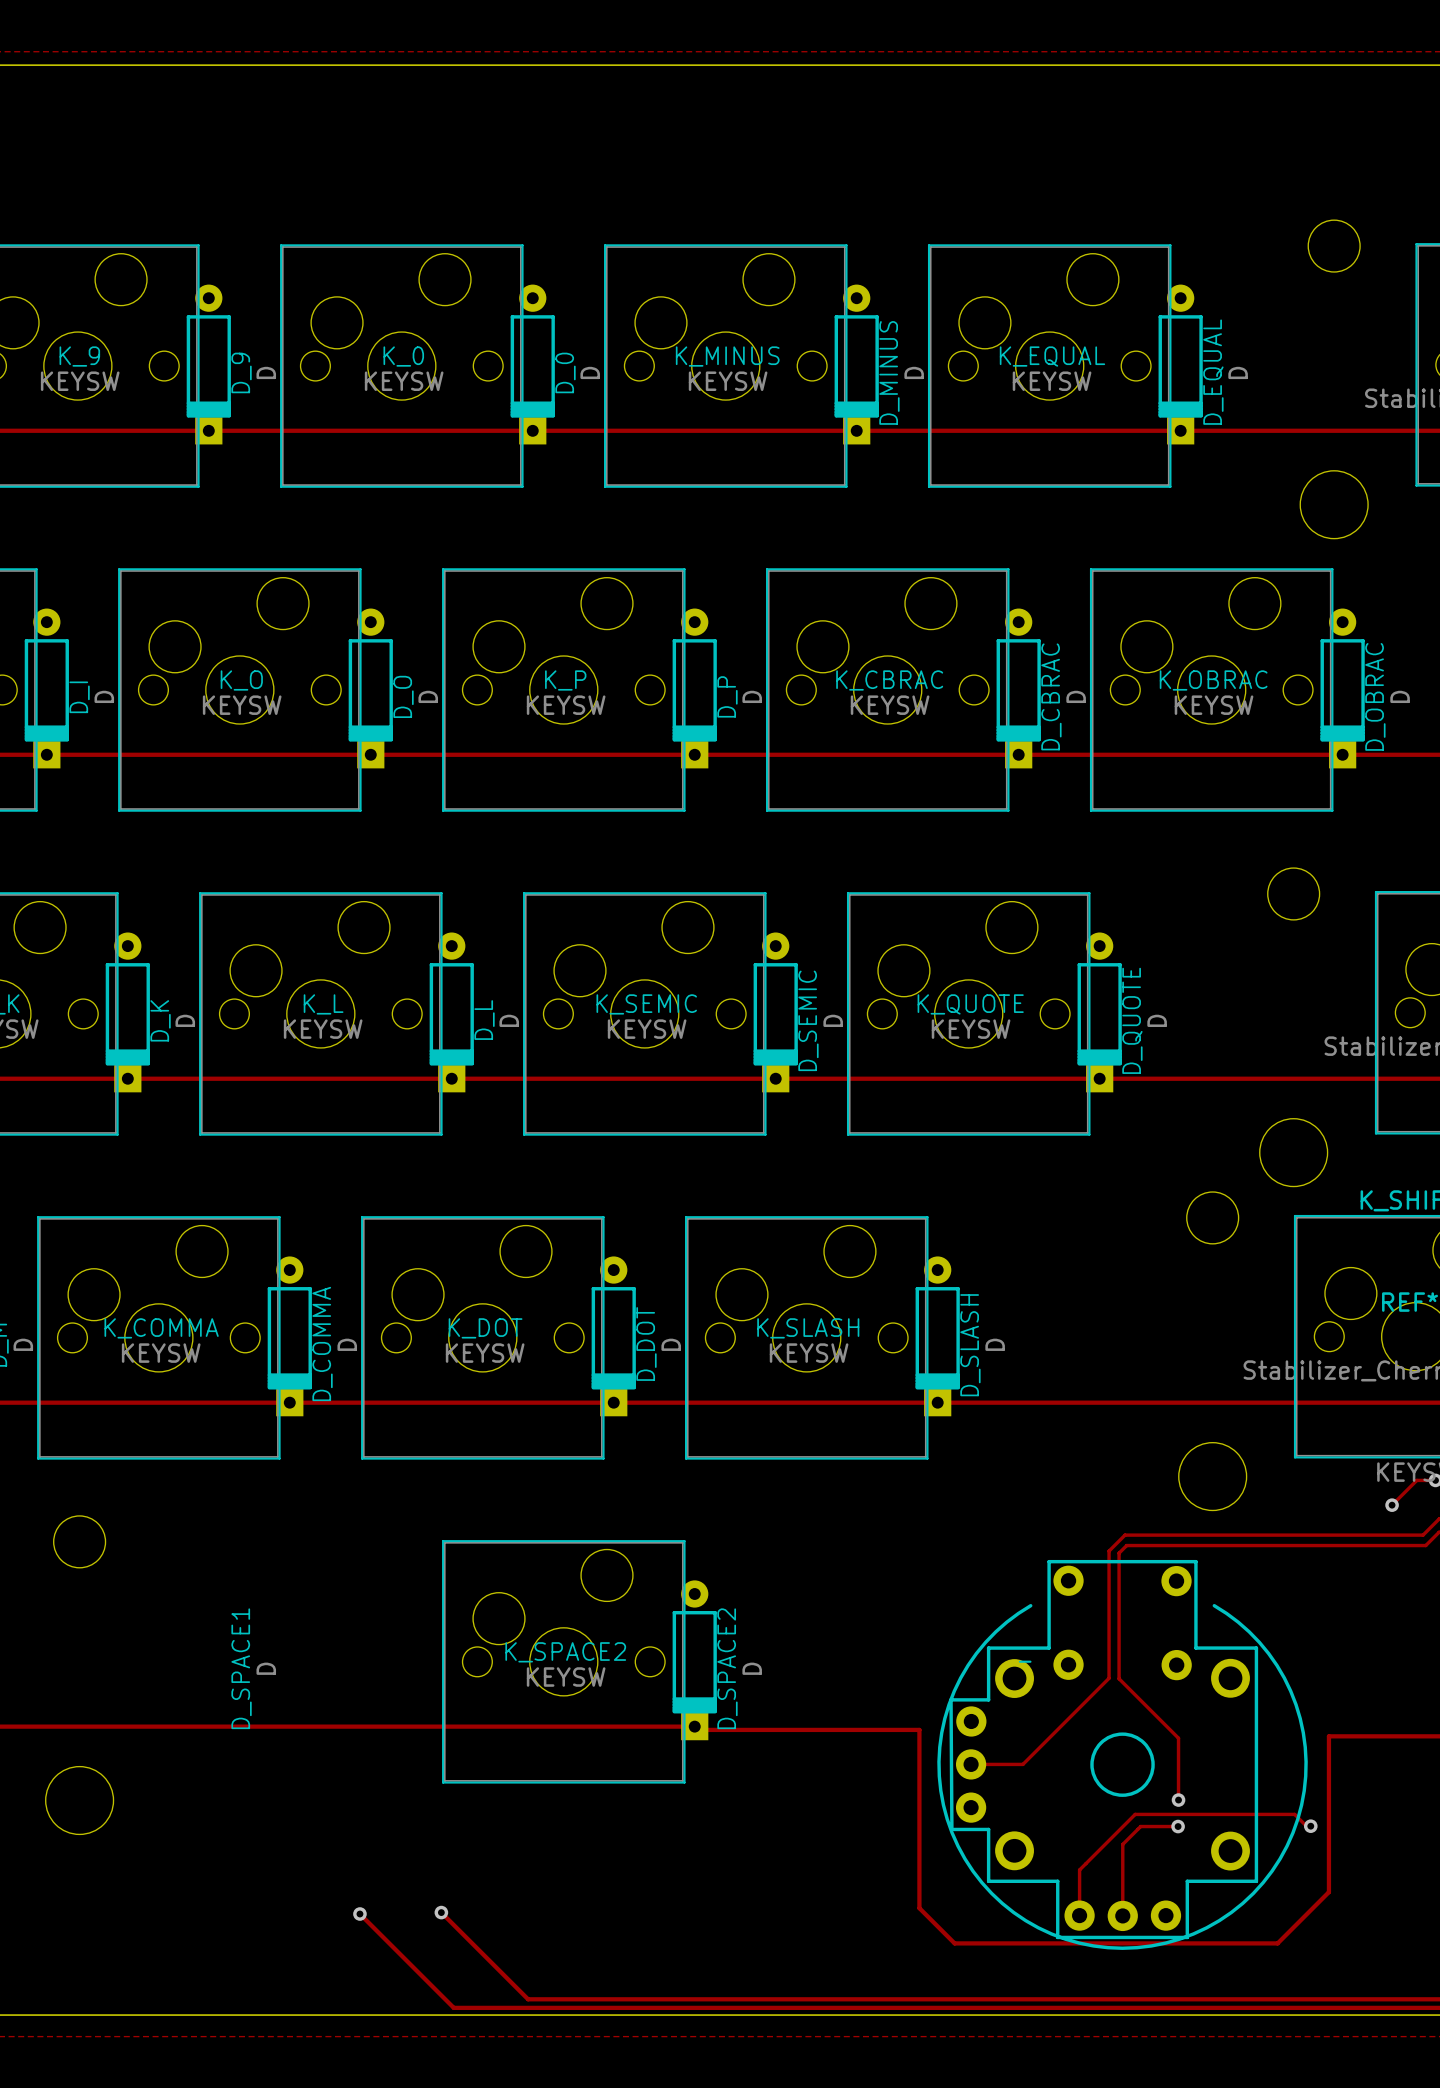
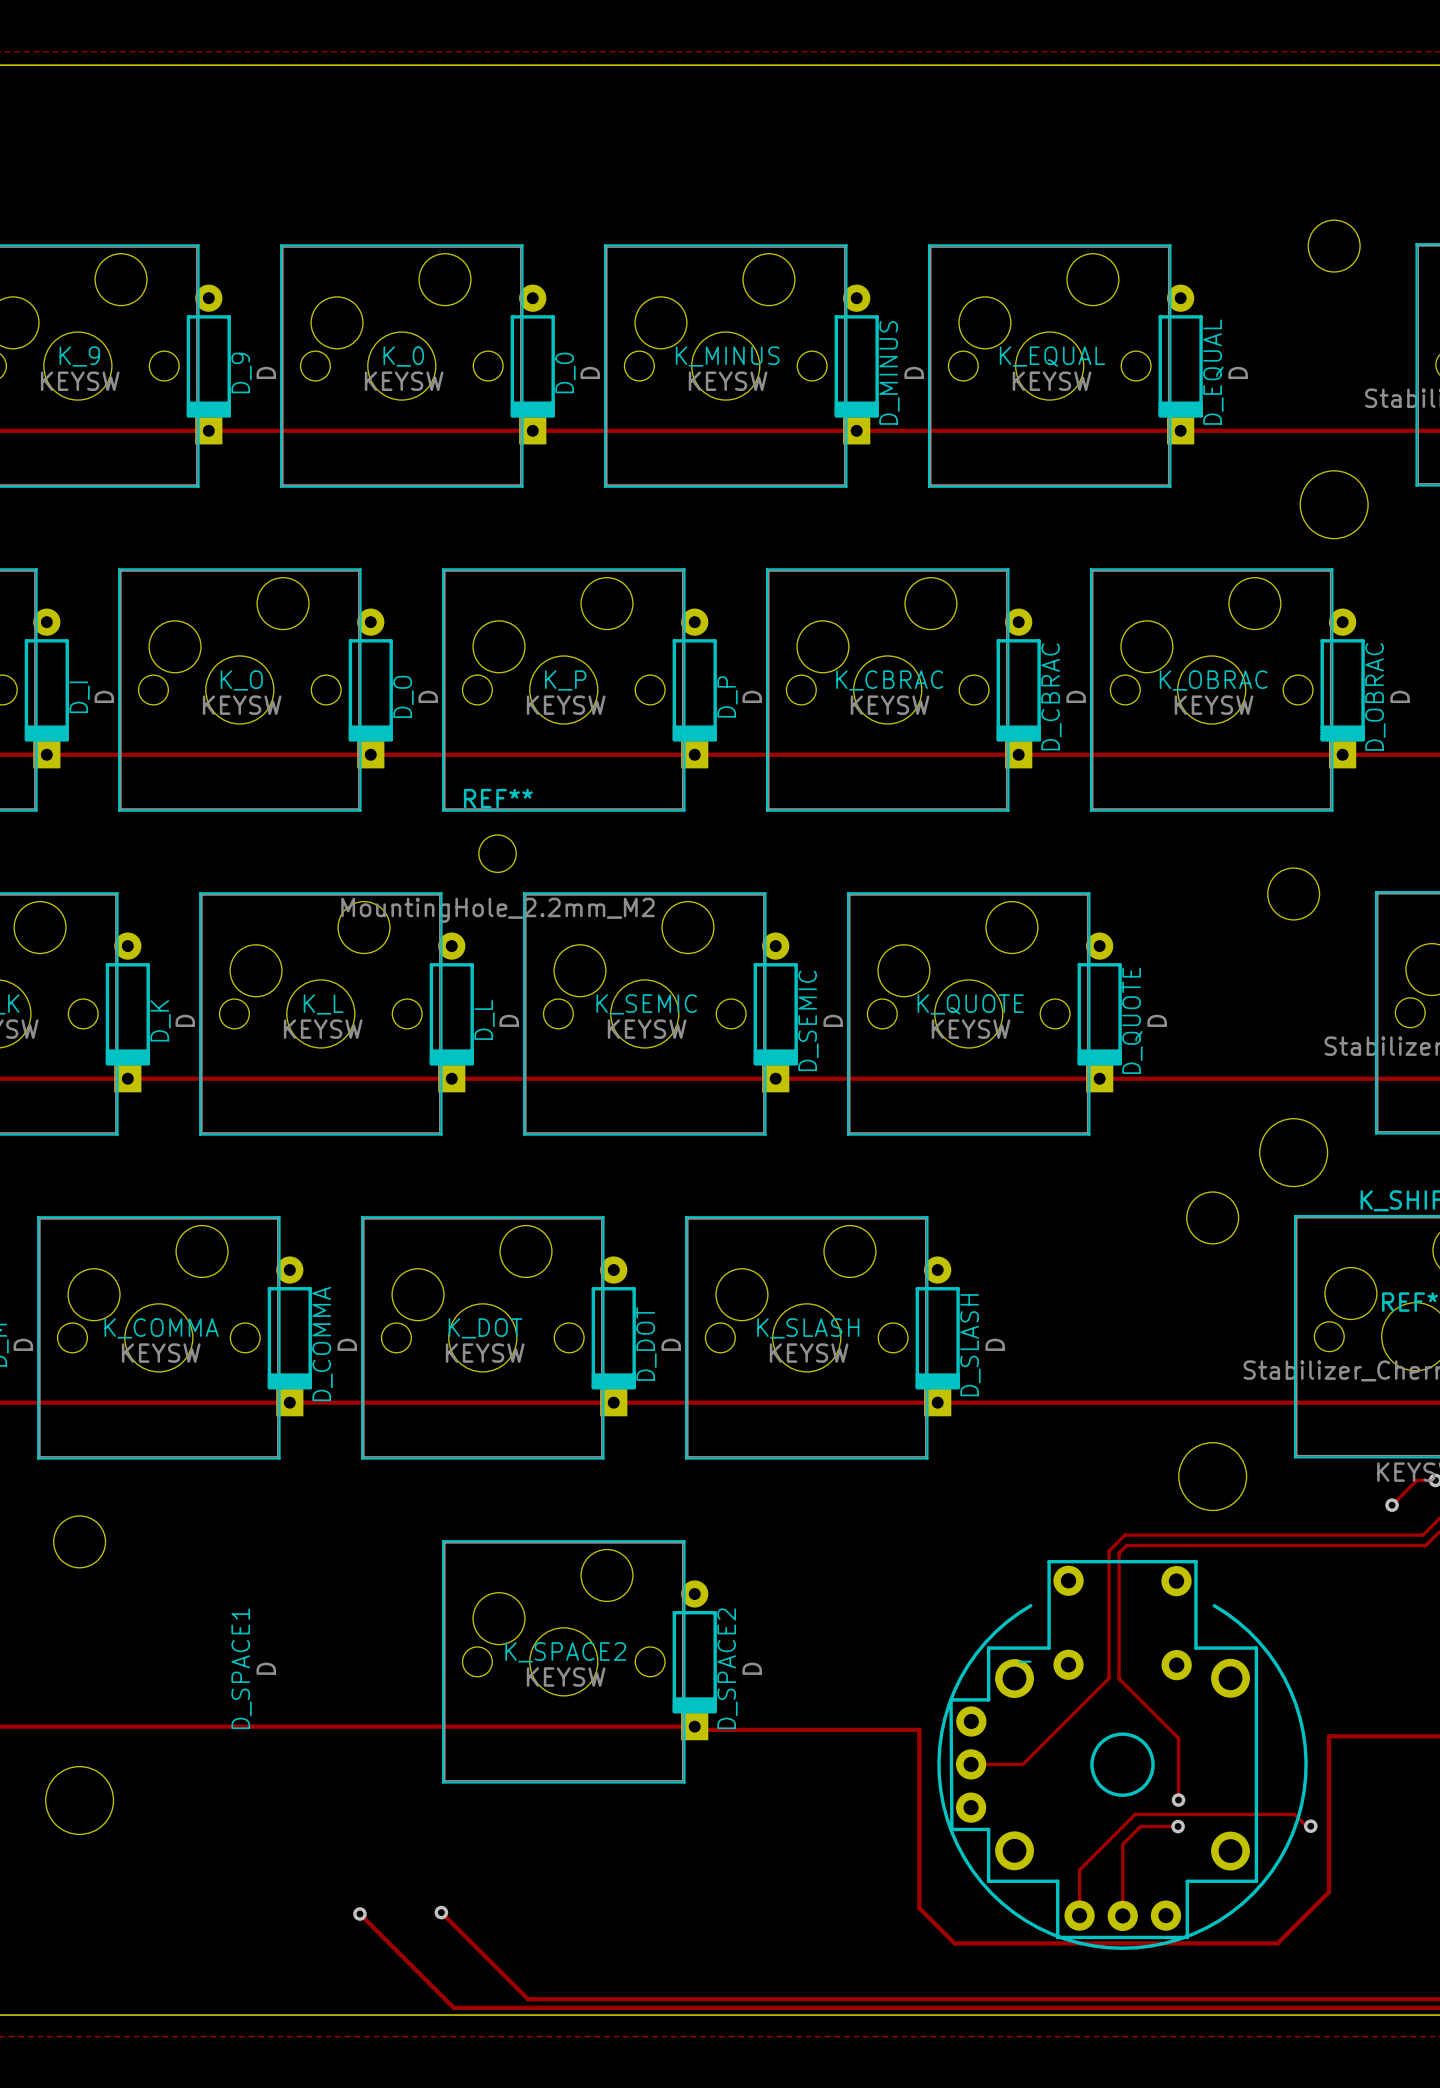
REF**: none -> MountingHole_2.2mm_M2 (497, 853)

